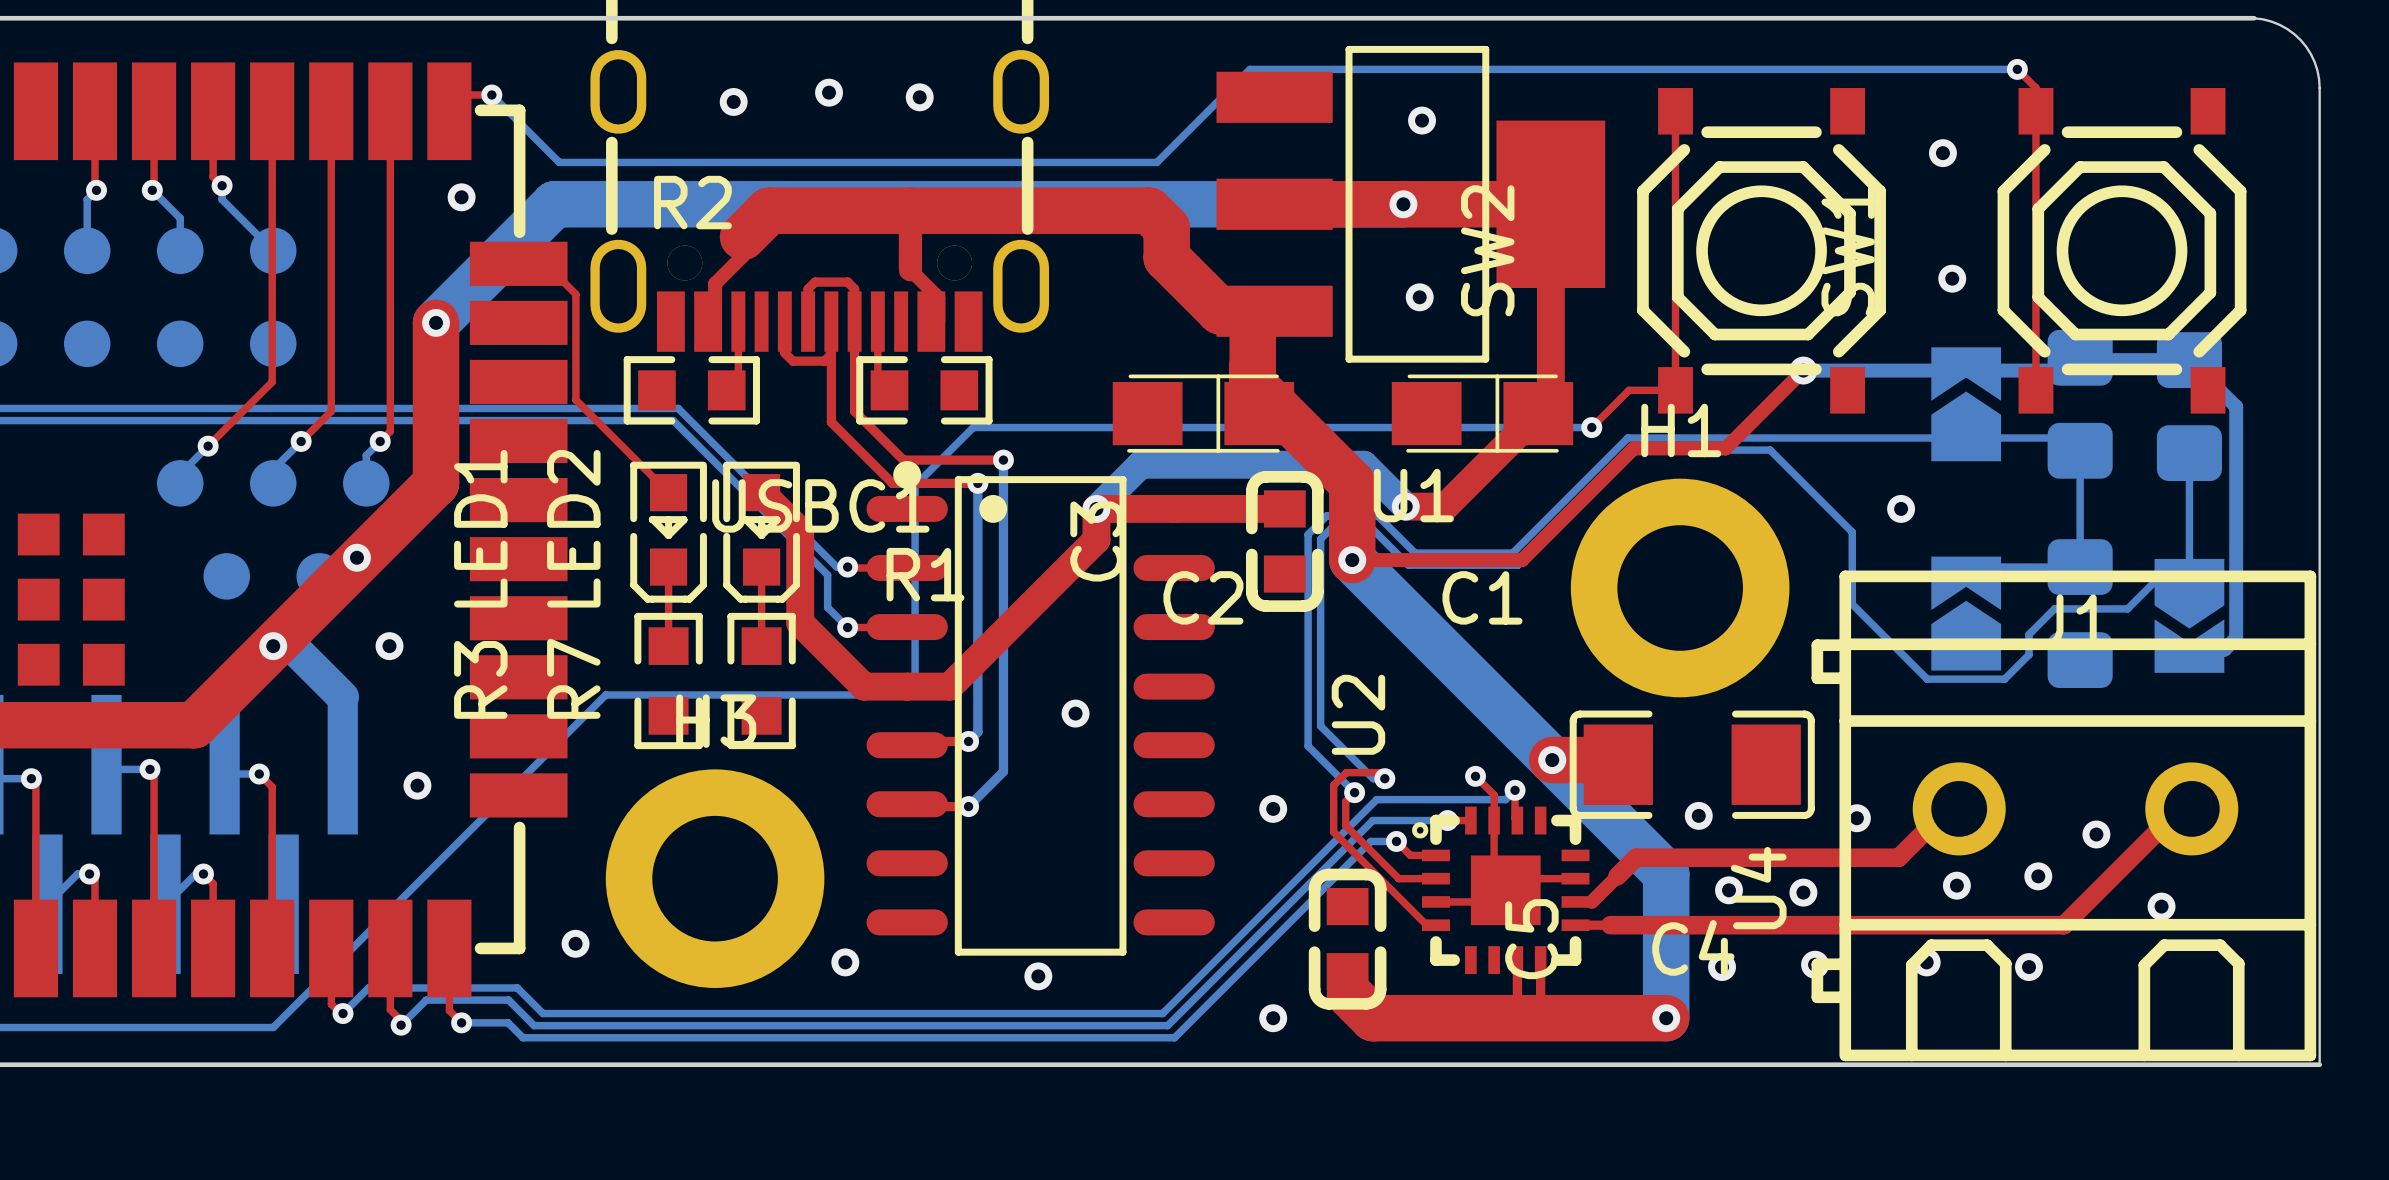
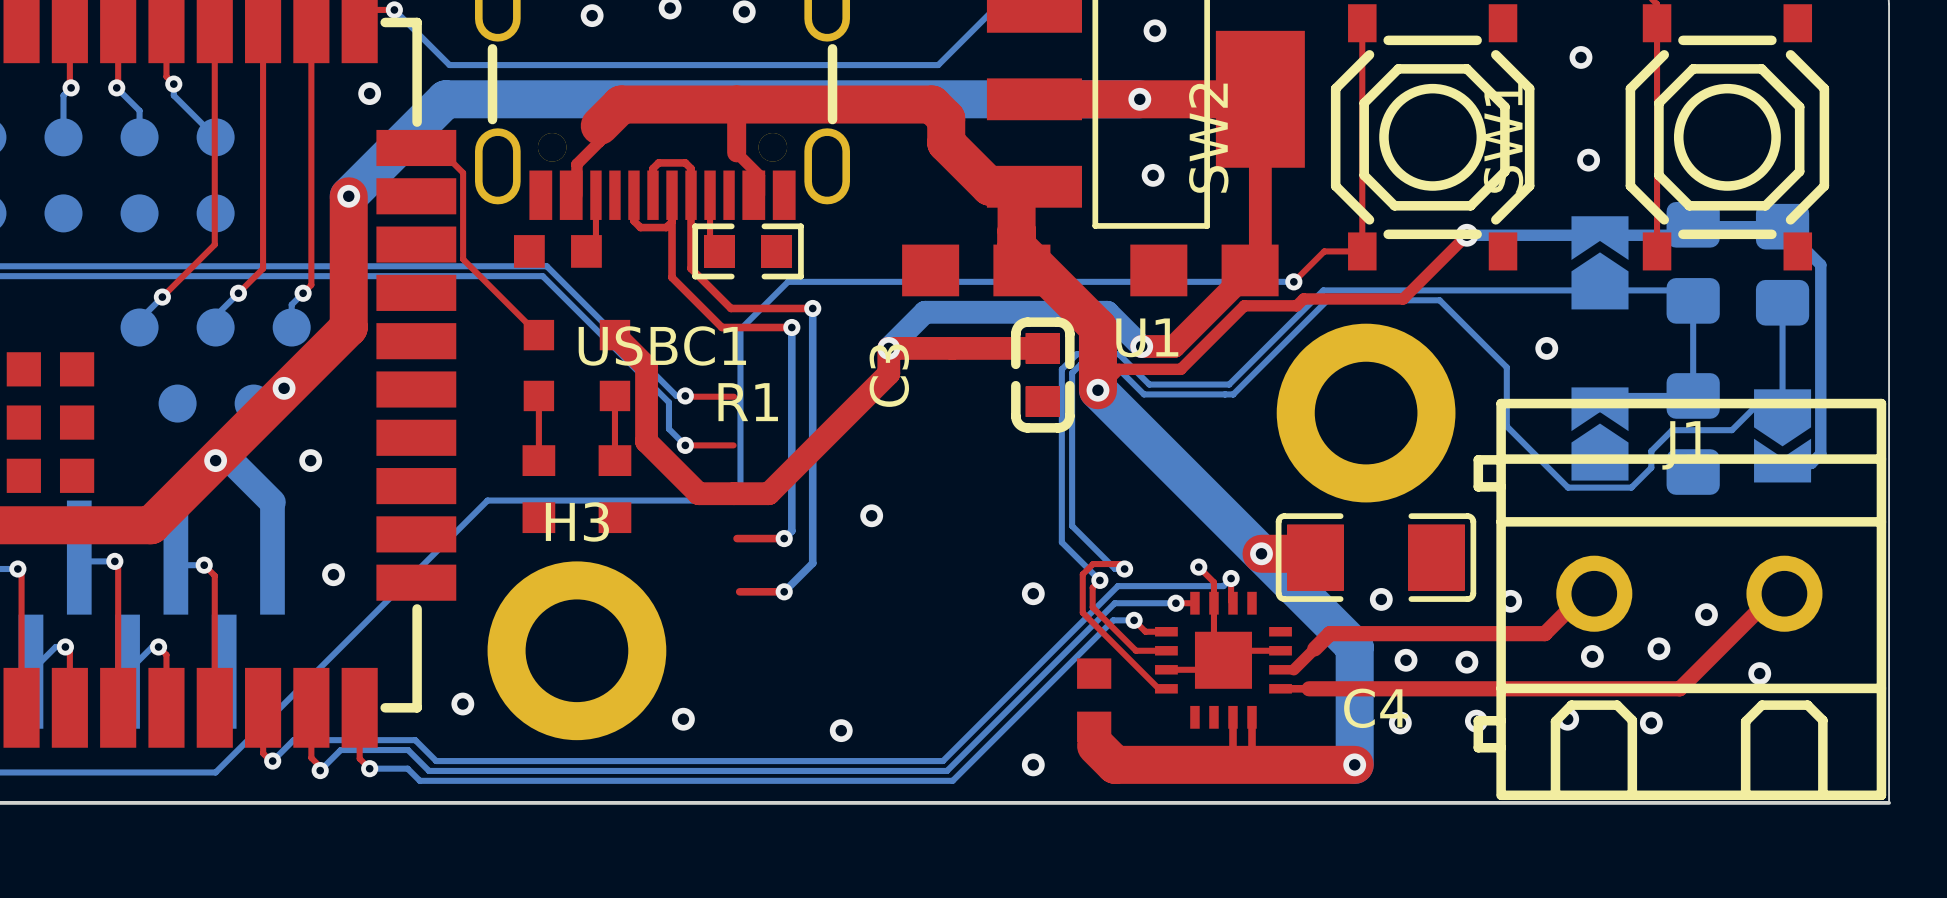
R2: (691, 390) -> none
part: none -> (748, 251)
C2: (1203, 413) -> none
C1: (1482, 413) -> none
H1 name: H1 (1681, 430) -> none
top track: (1633, 448) (1522, 560) (1352, 560) -> (1328, 298) (1303, 298) (1296, 305) (1244, 305) (1180, 369) (1118, 369) (1097, 390)
LED1: (668, 532) -> none
LED2: (761, 532) -> none
part: none -> (1042, 375)
R3: (668, 681) -> none
R7: (761, 681) -> none
U2: (1040, 708) -> none
part: none -> (1375, 557)
U4: (1500, 890) -> none
part: none -> (1223, 660)
C5: (1347, 939) -> none

